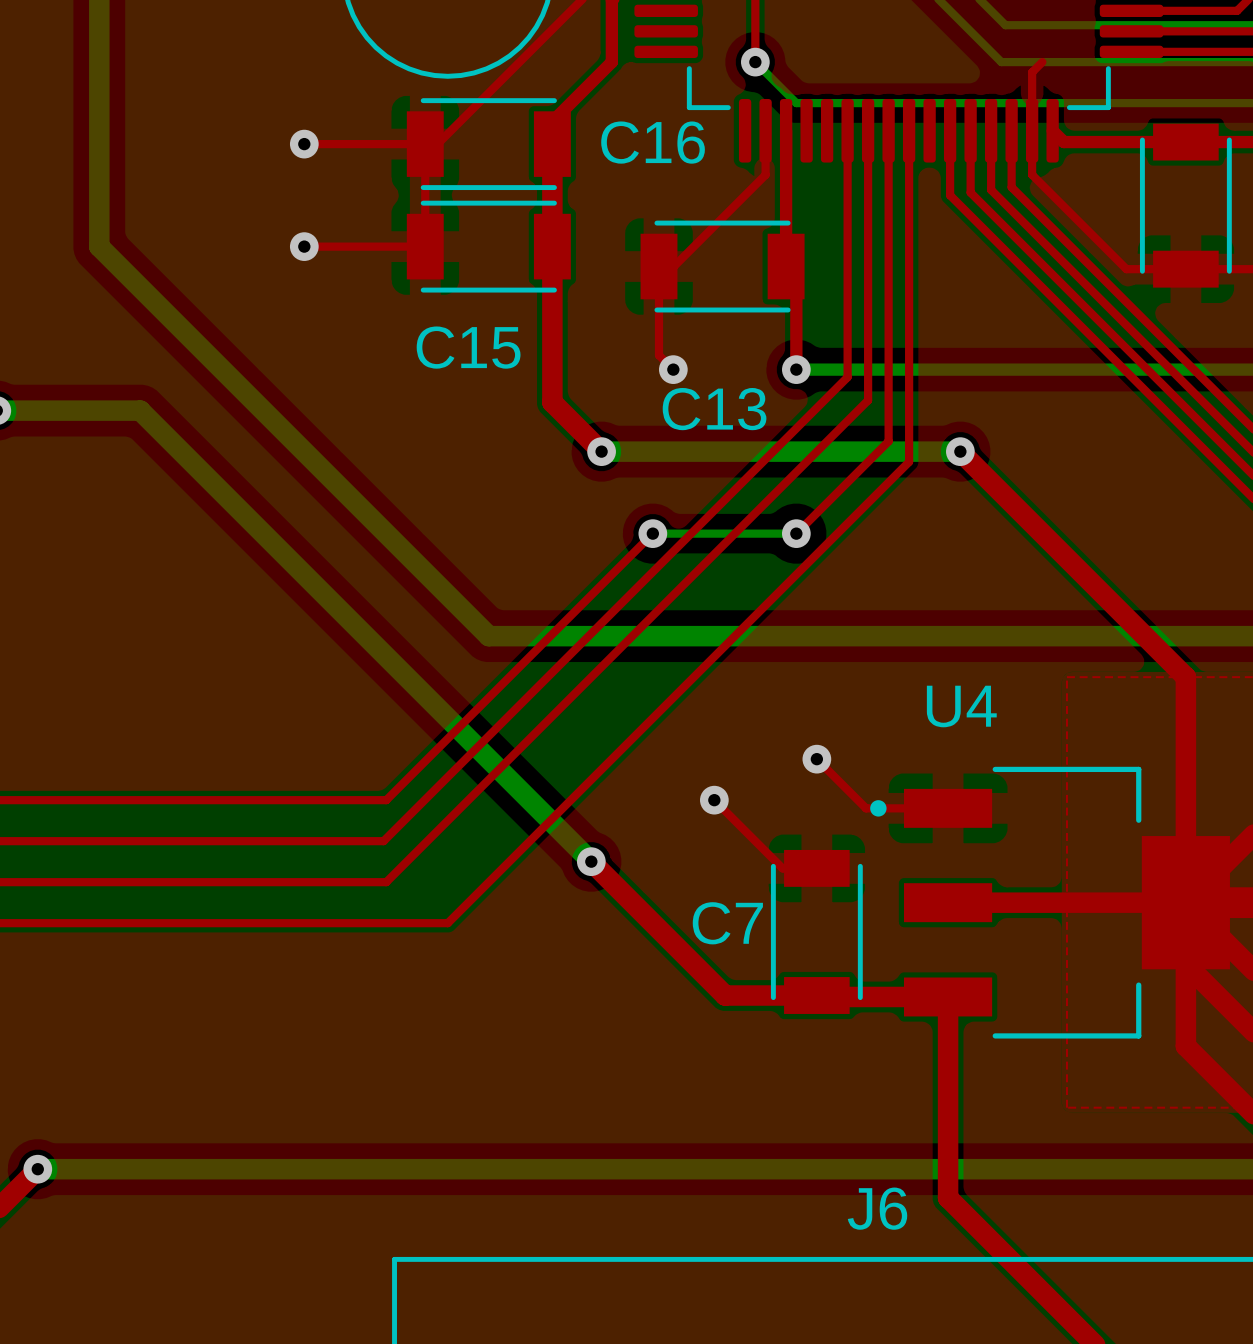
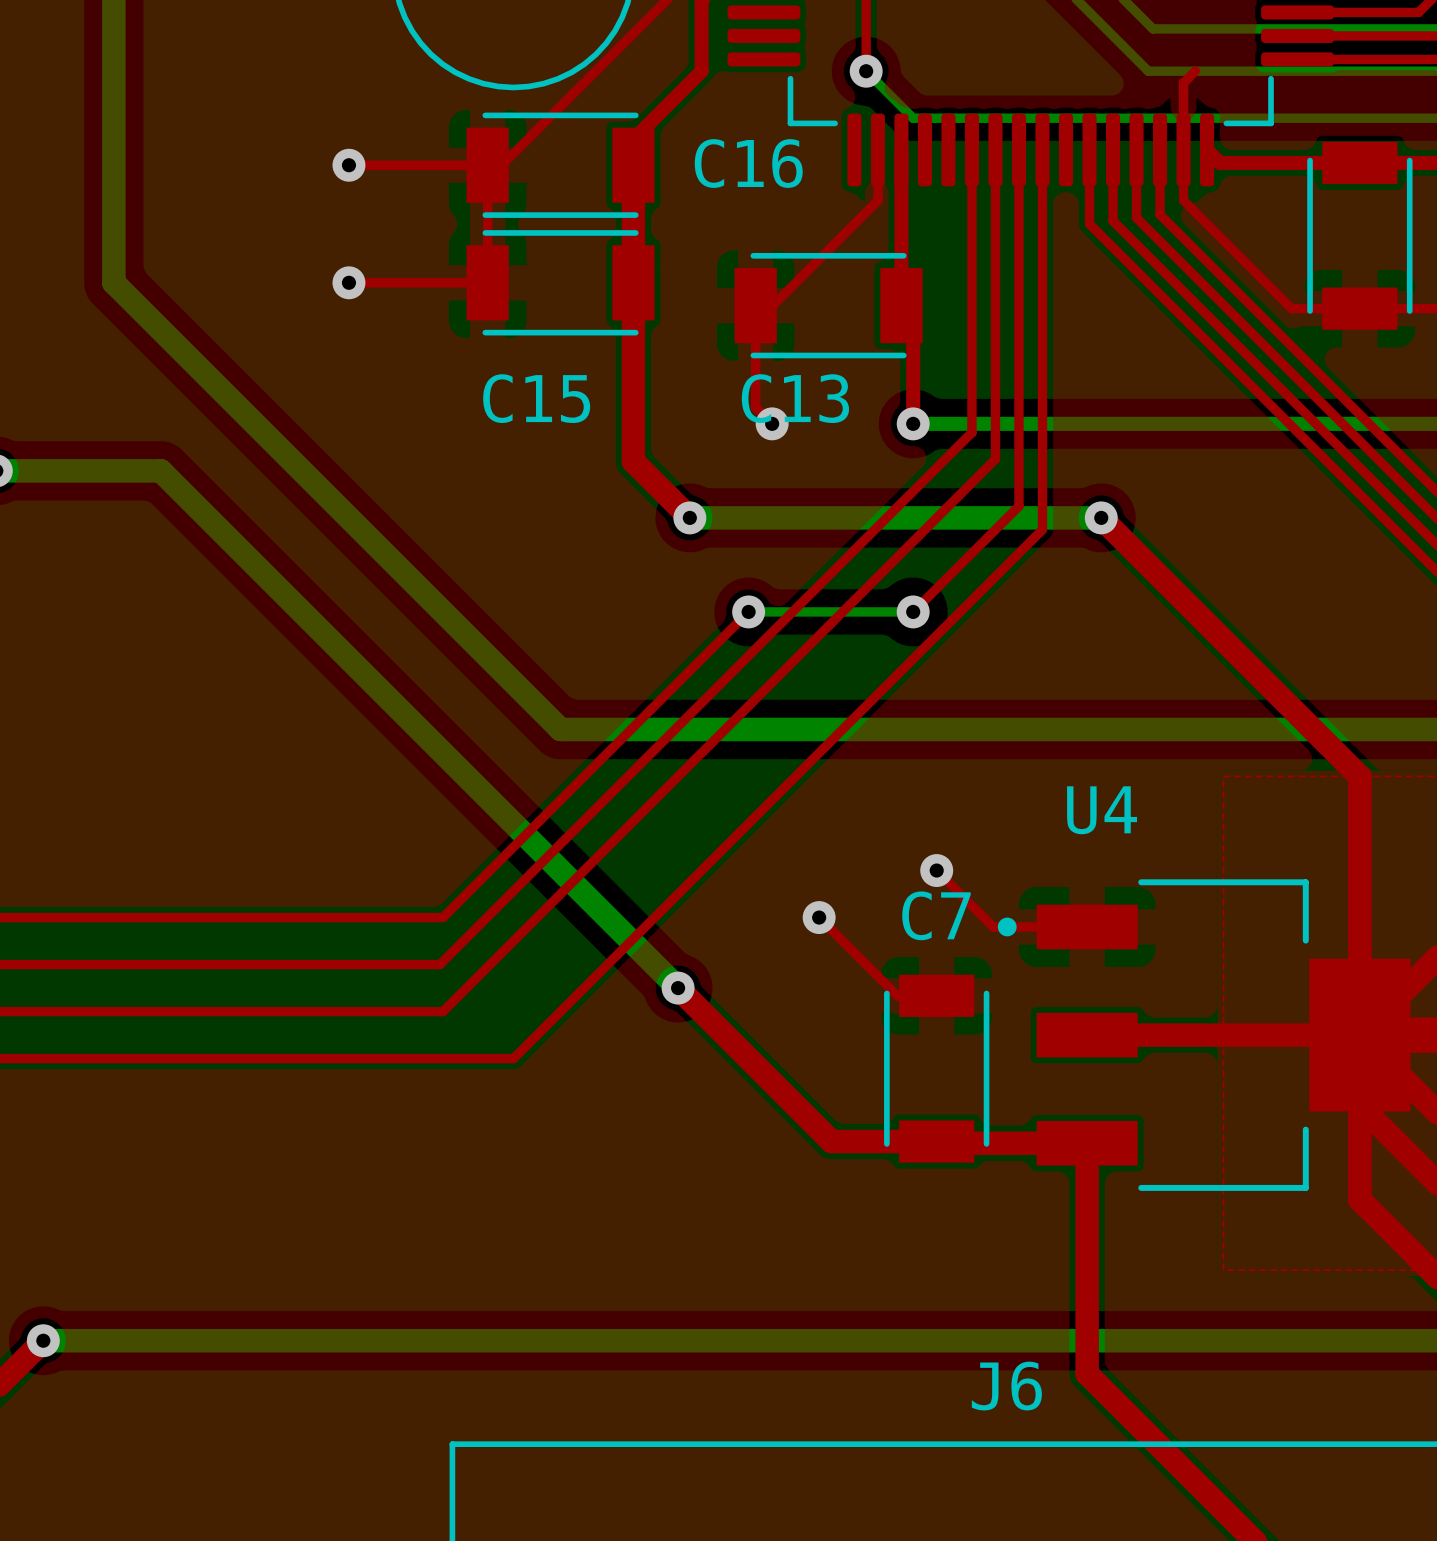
C13 name position: C13 (714, 409) -> C13 (795, 398)
C7 name position: C7 (727, 923) -> C7 (936, 915)

